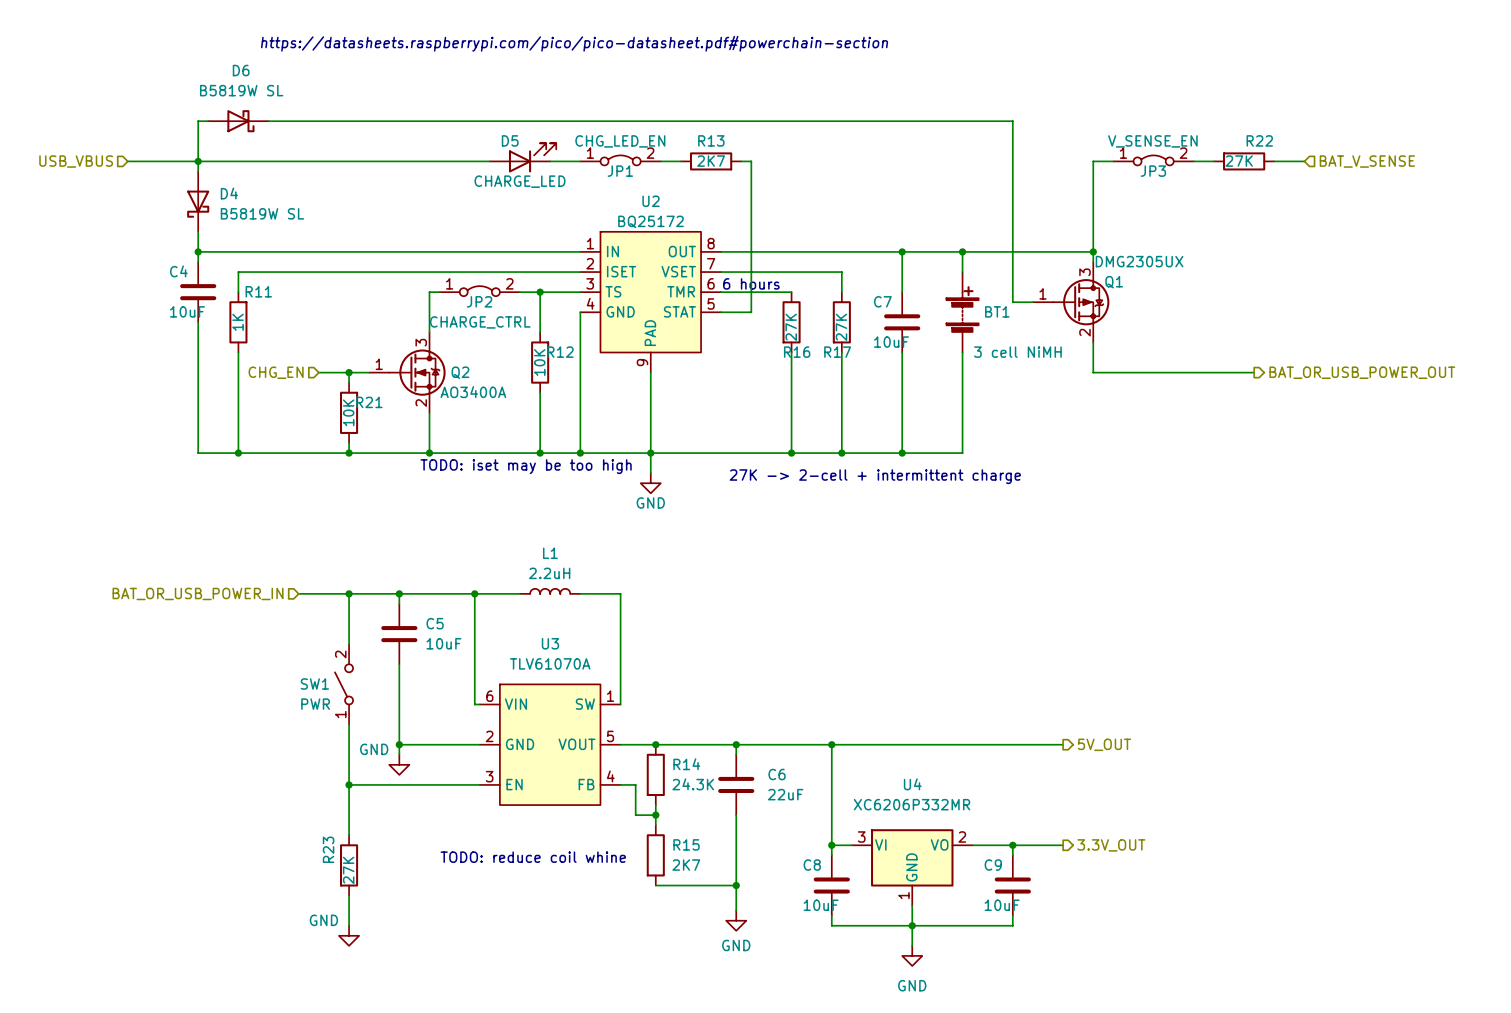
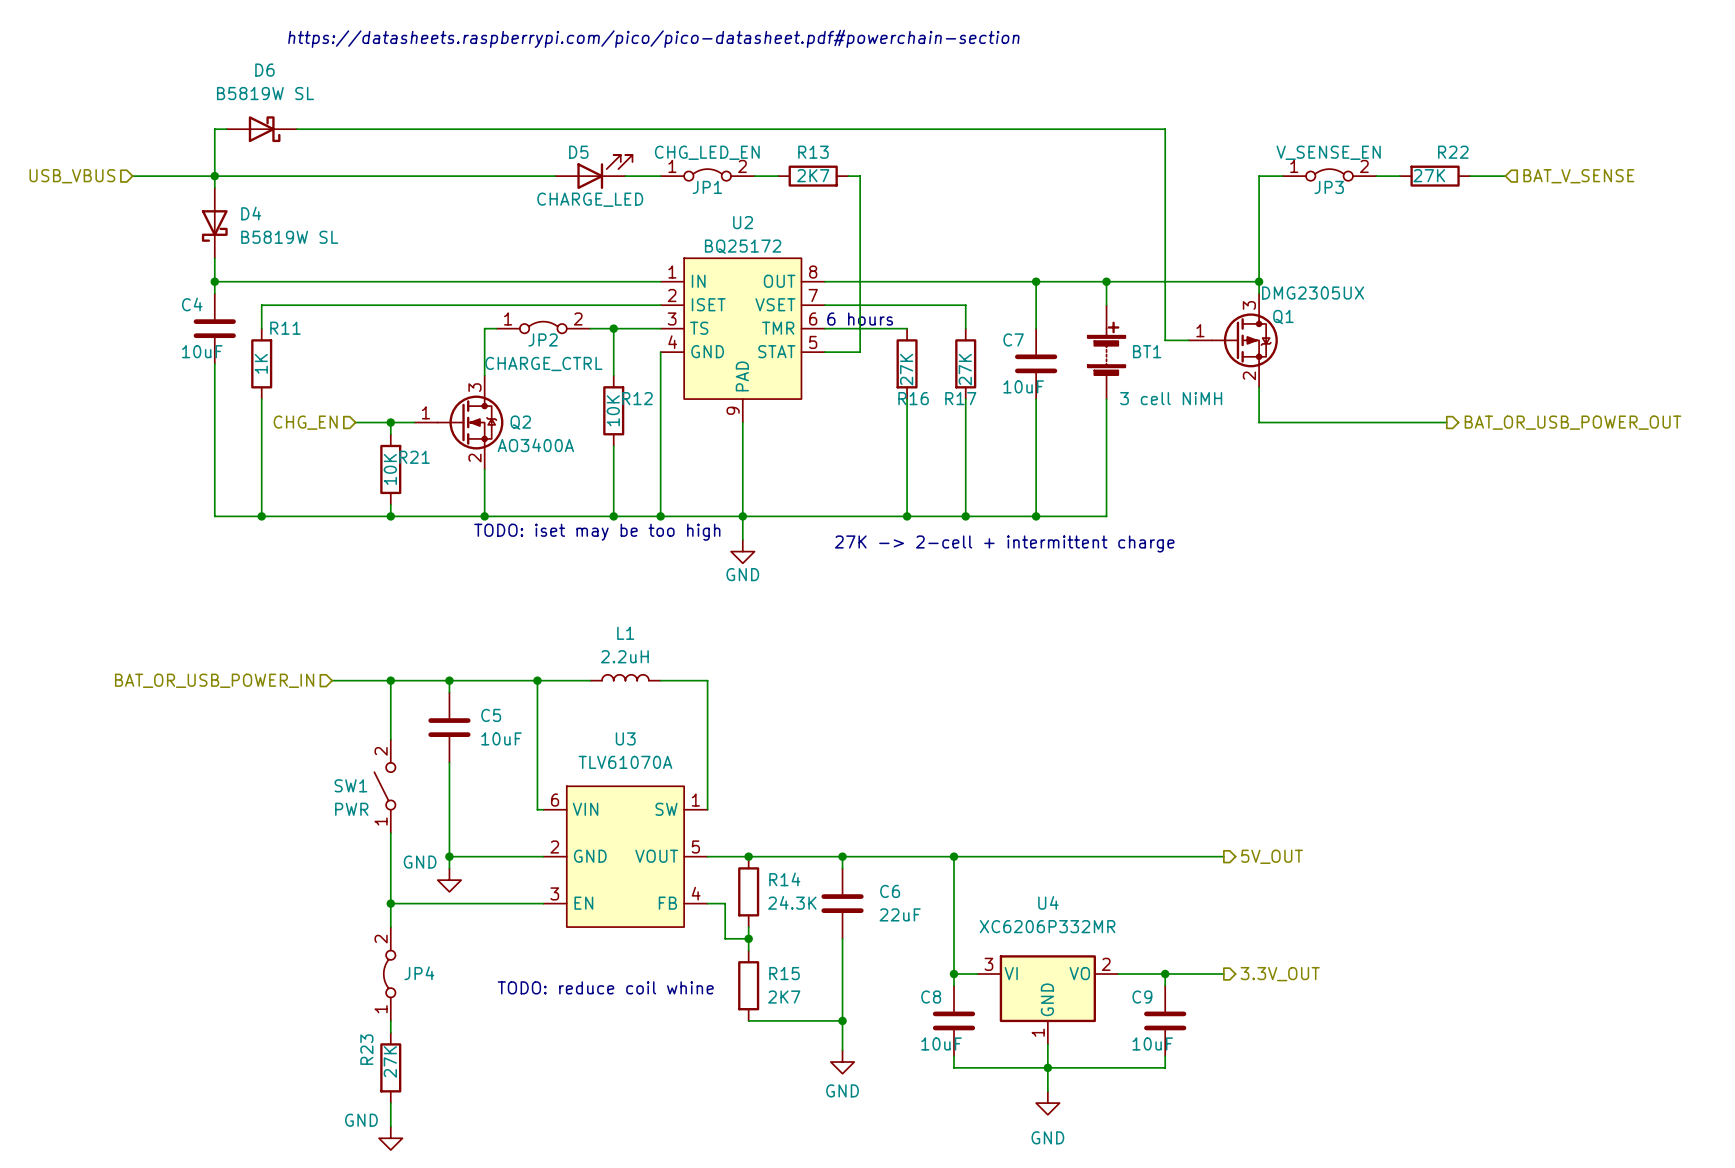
JP4: none -> (389, 974)
R23 position: (349, 865) -> (390, 1067)
R23 value position: 27K (348, 870) -> 27K (390, 1061)
power symbol position: GND (349, 935) -> GND (390, 1138)
wire: none -> (390, 1103) (390, 1126)

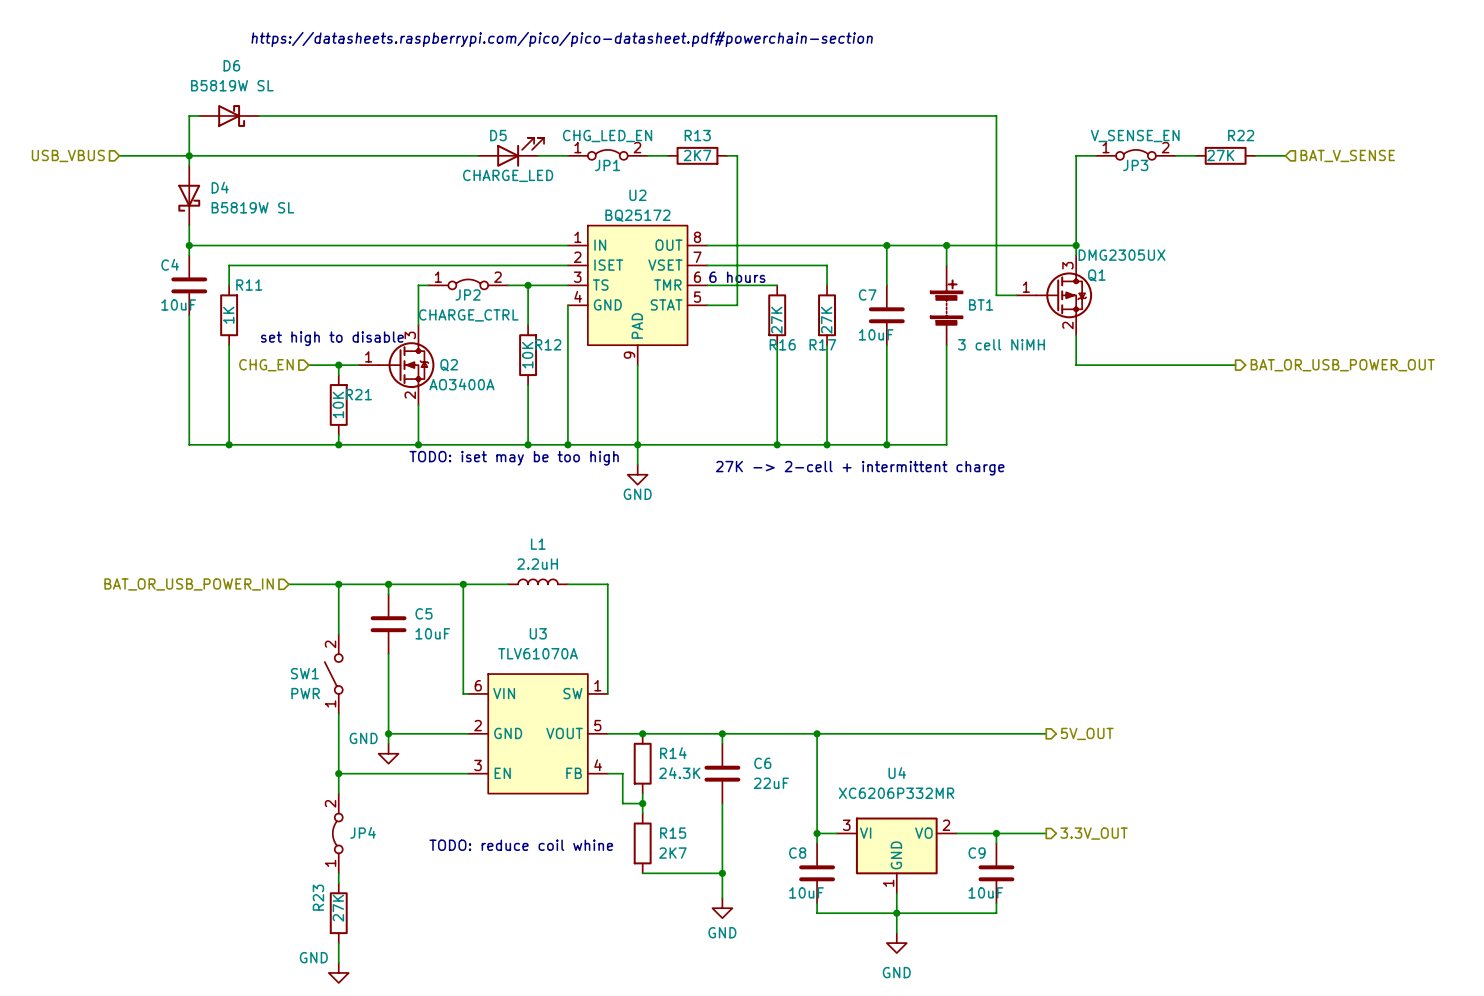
text: none -> set high to disable (332, 338)

